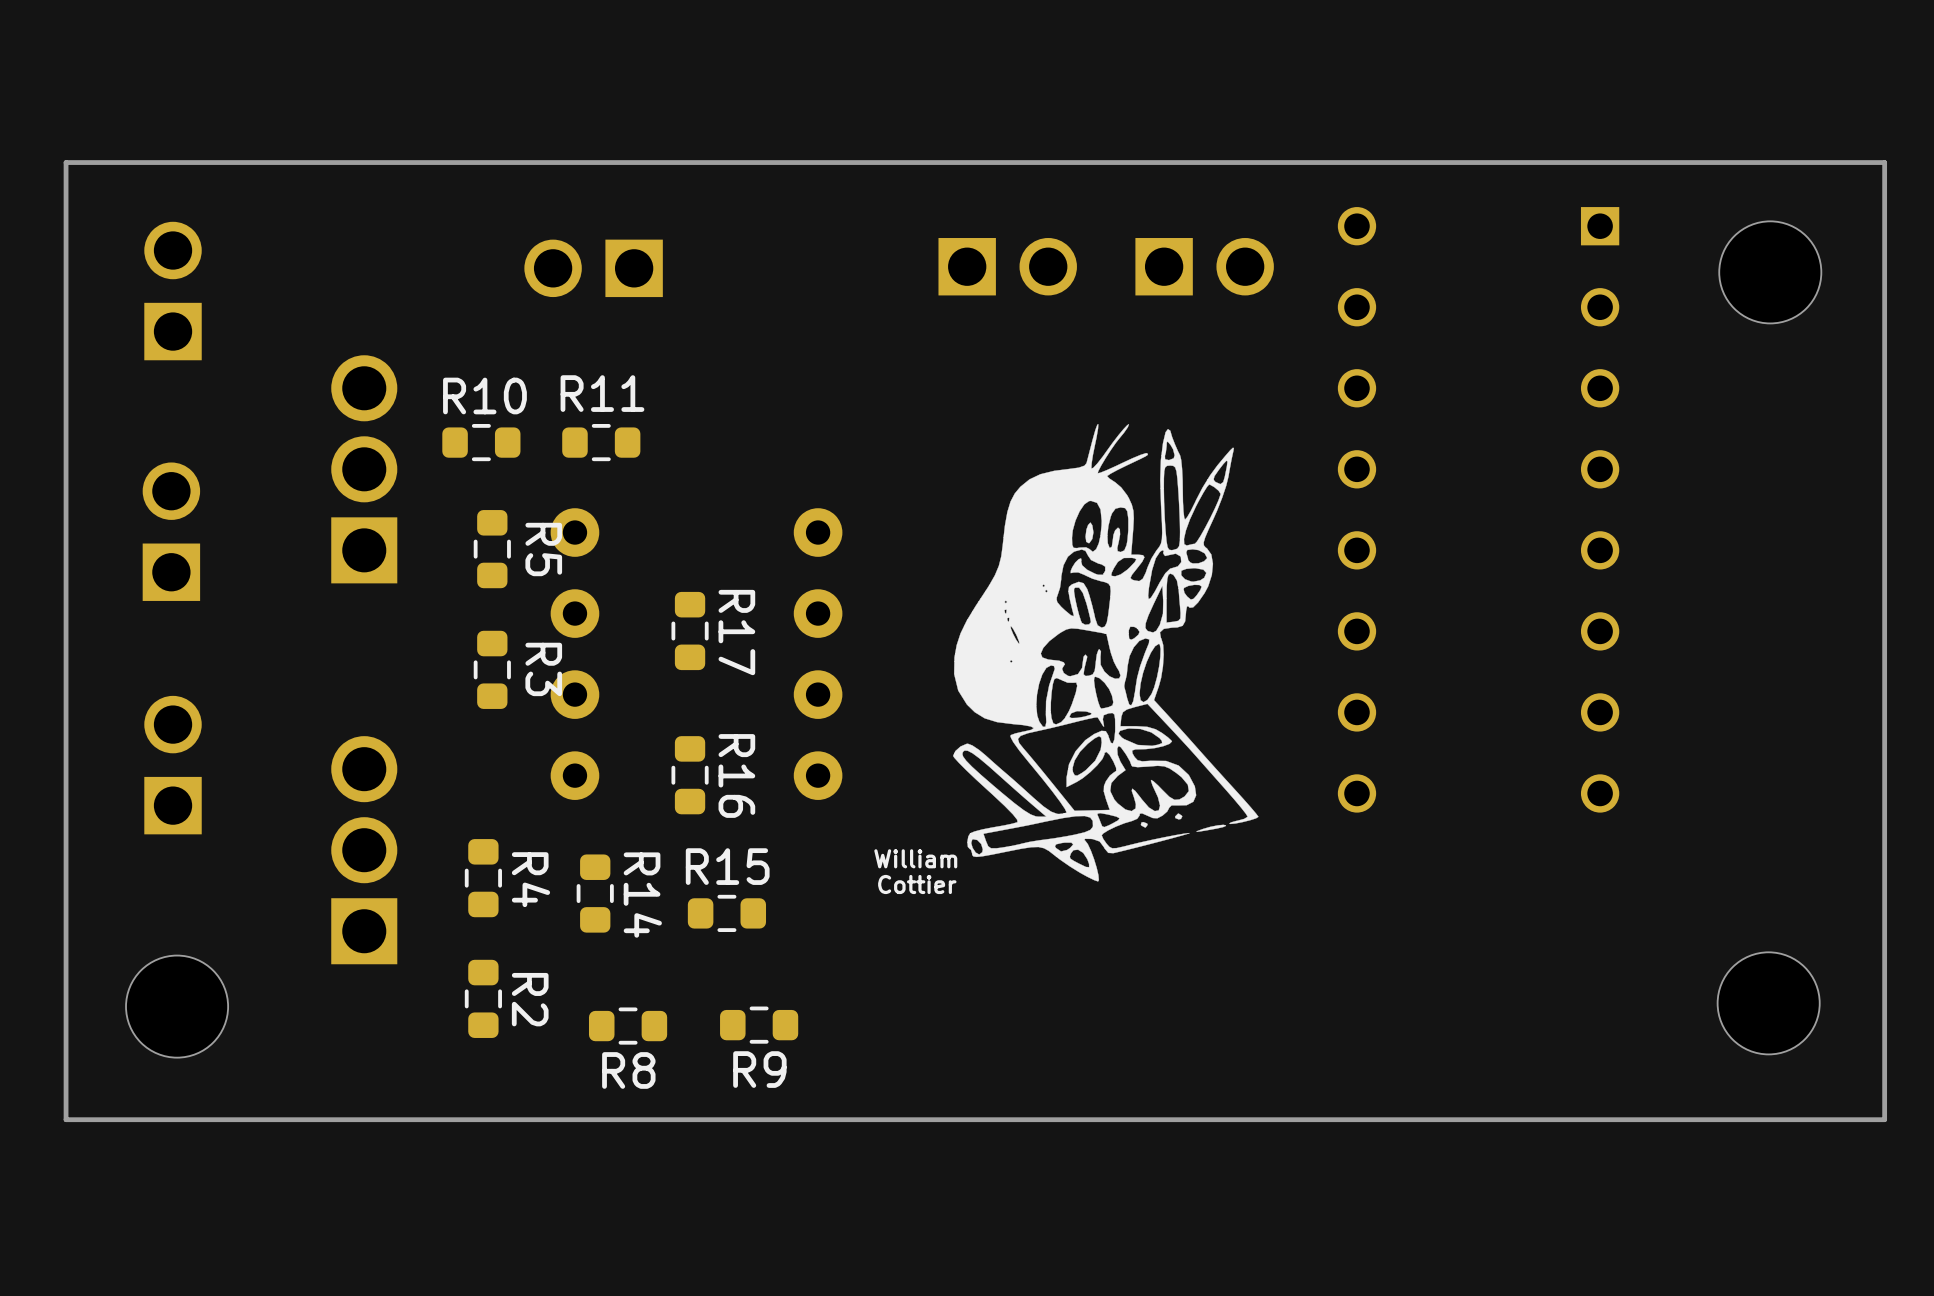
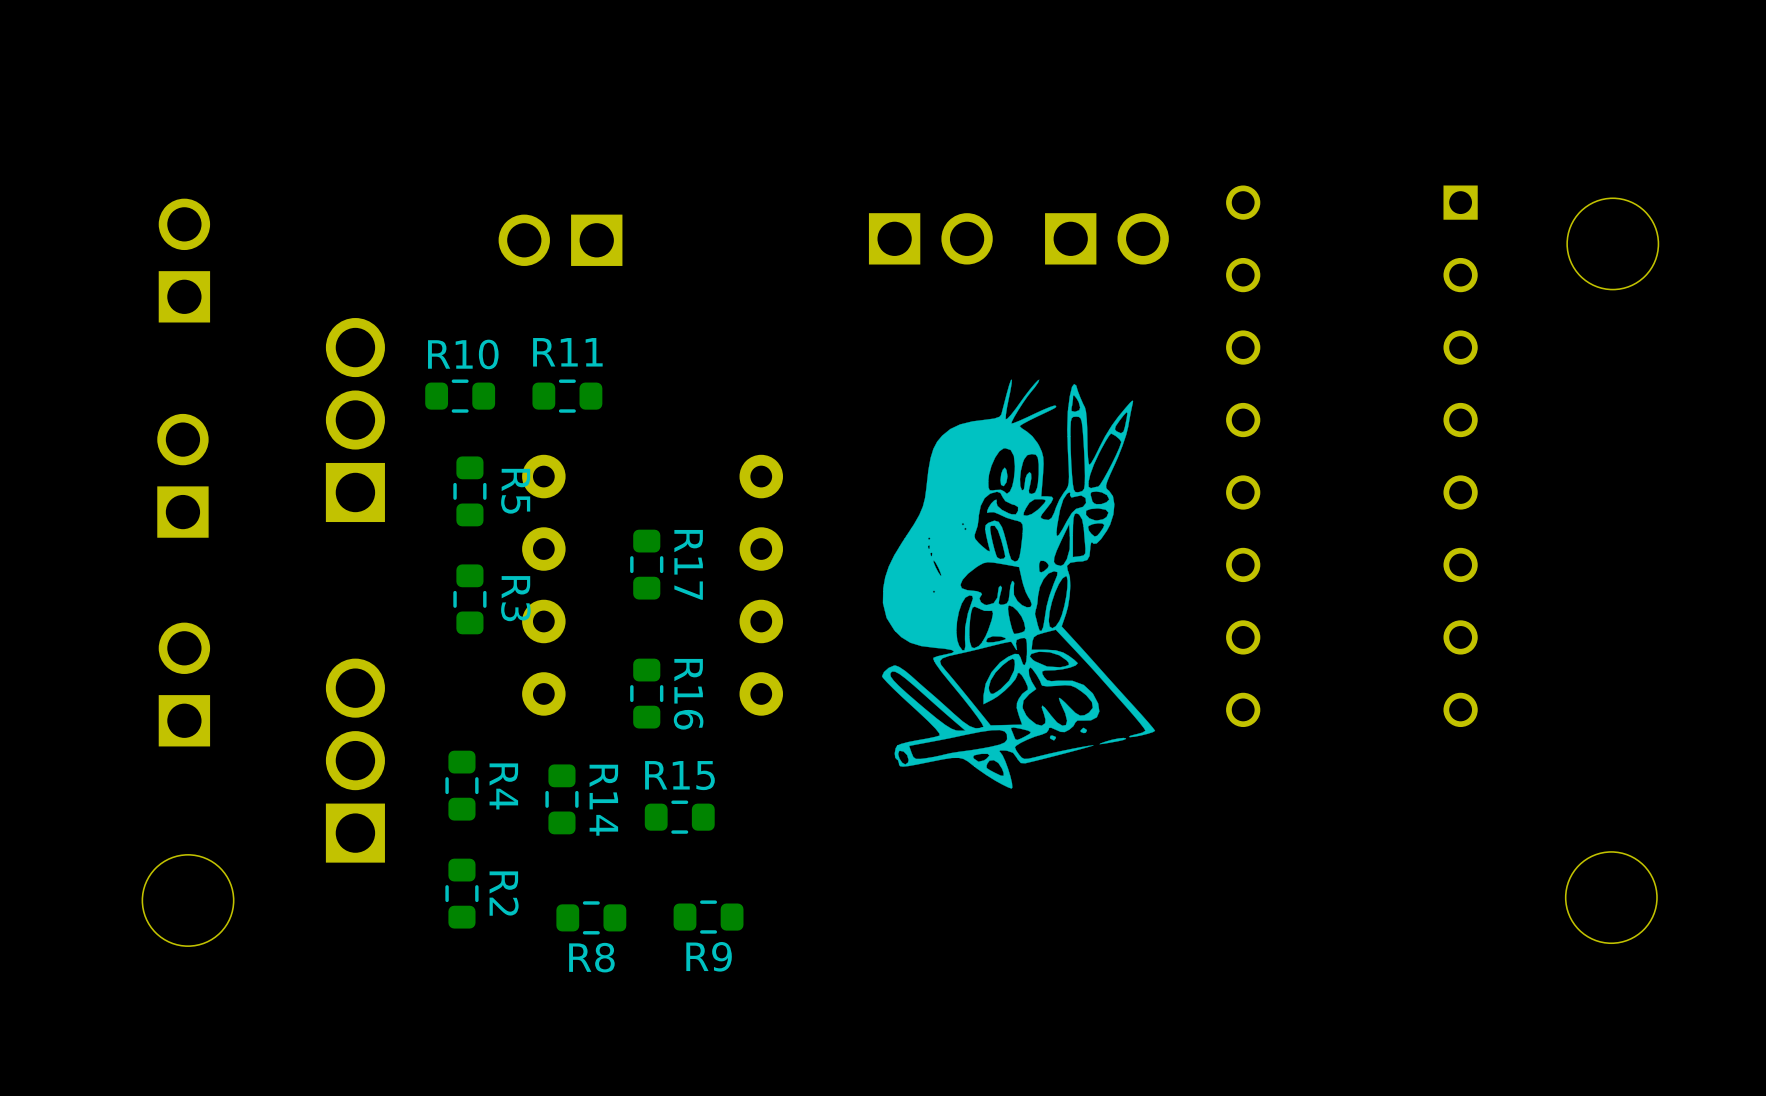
board edge: (1884, 162) (1884, 1119) (66, 1119) (66, 162) (1884, 162) -> none
text: William (915, 858) -> none
text: Cottier (917, 884) -> none

